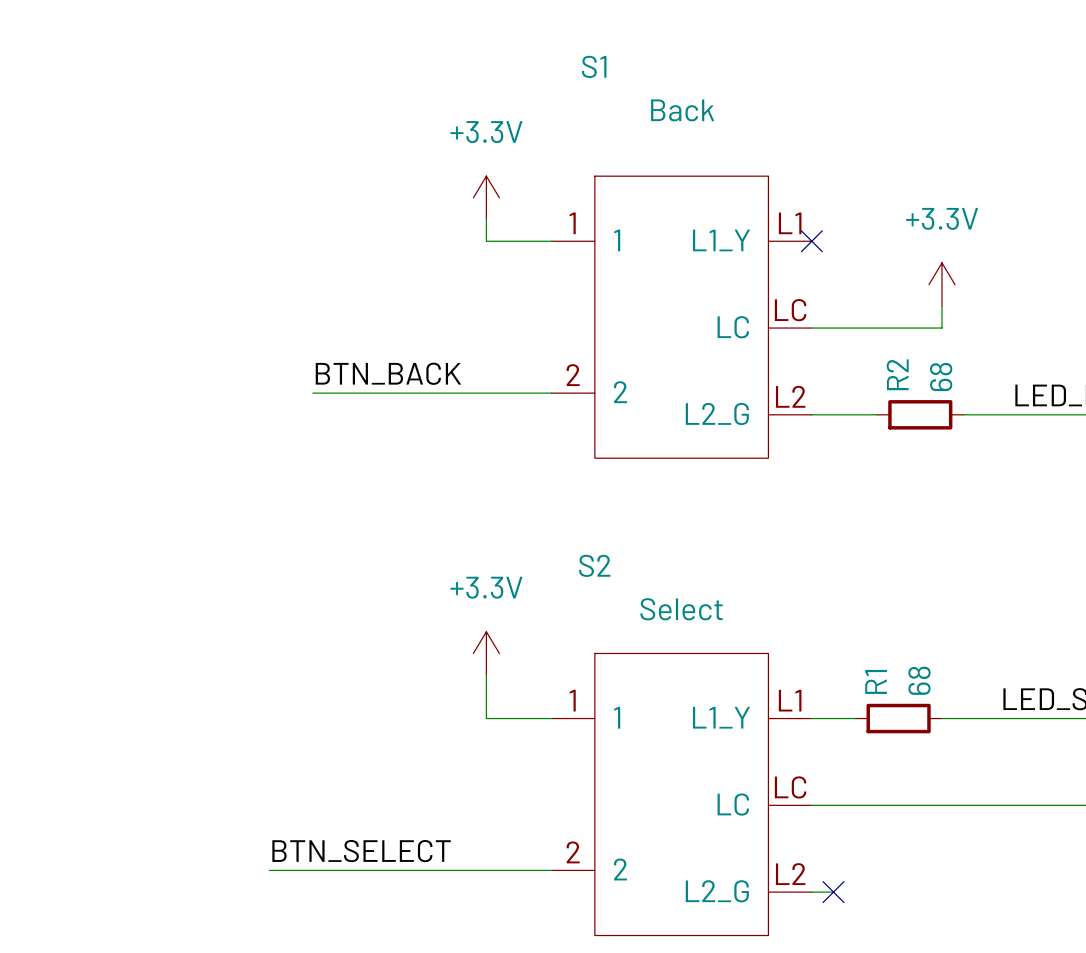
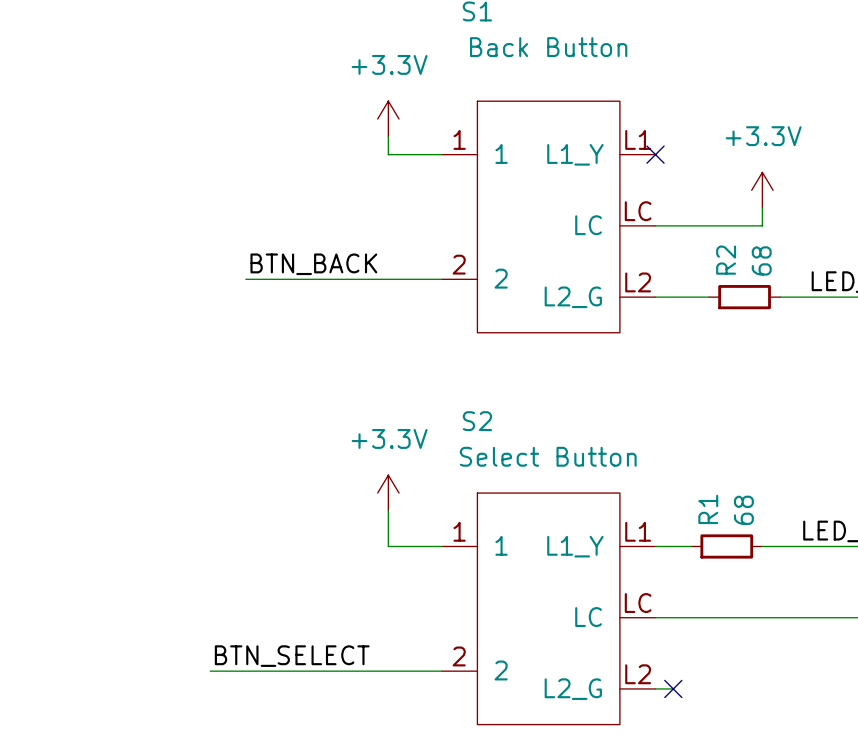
S1 value: Back (682, 110) -> Back Button (548, 47)
S2 value: Select (681, 609) -> Select Button (548, 456)

